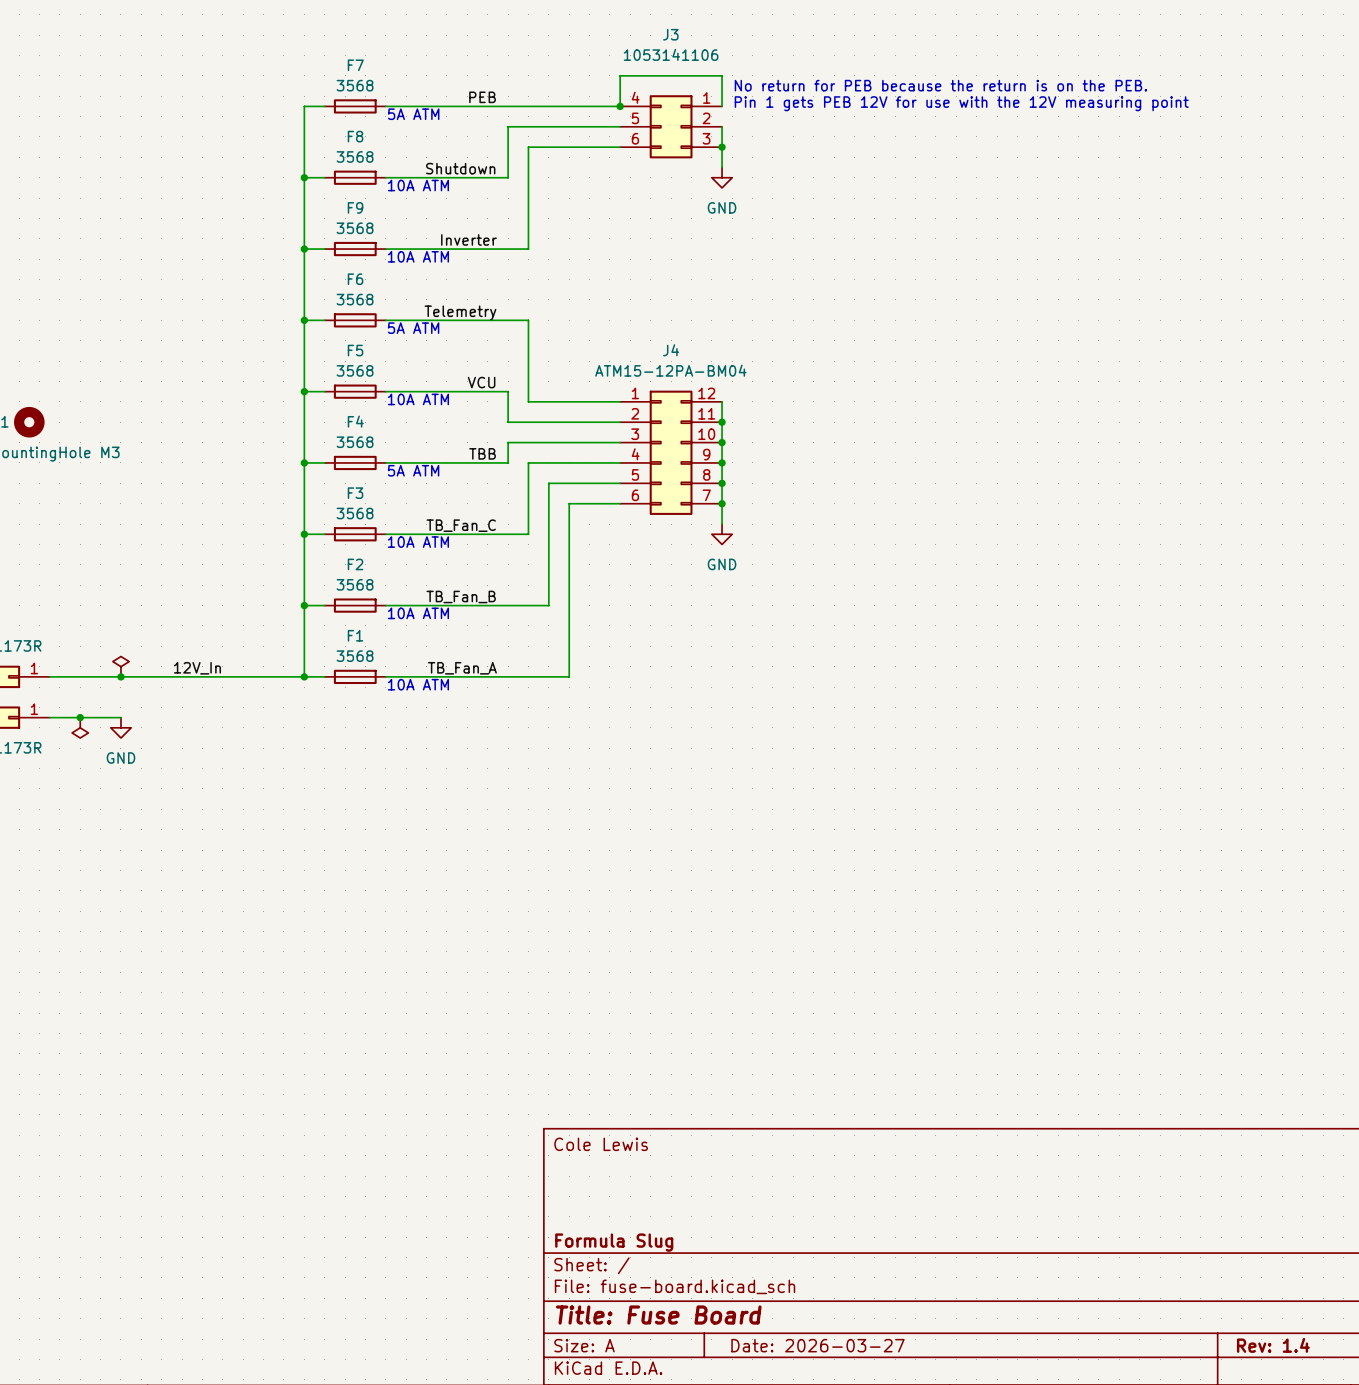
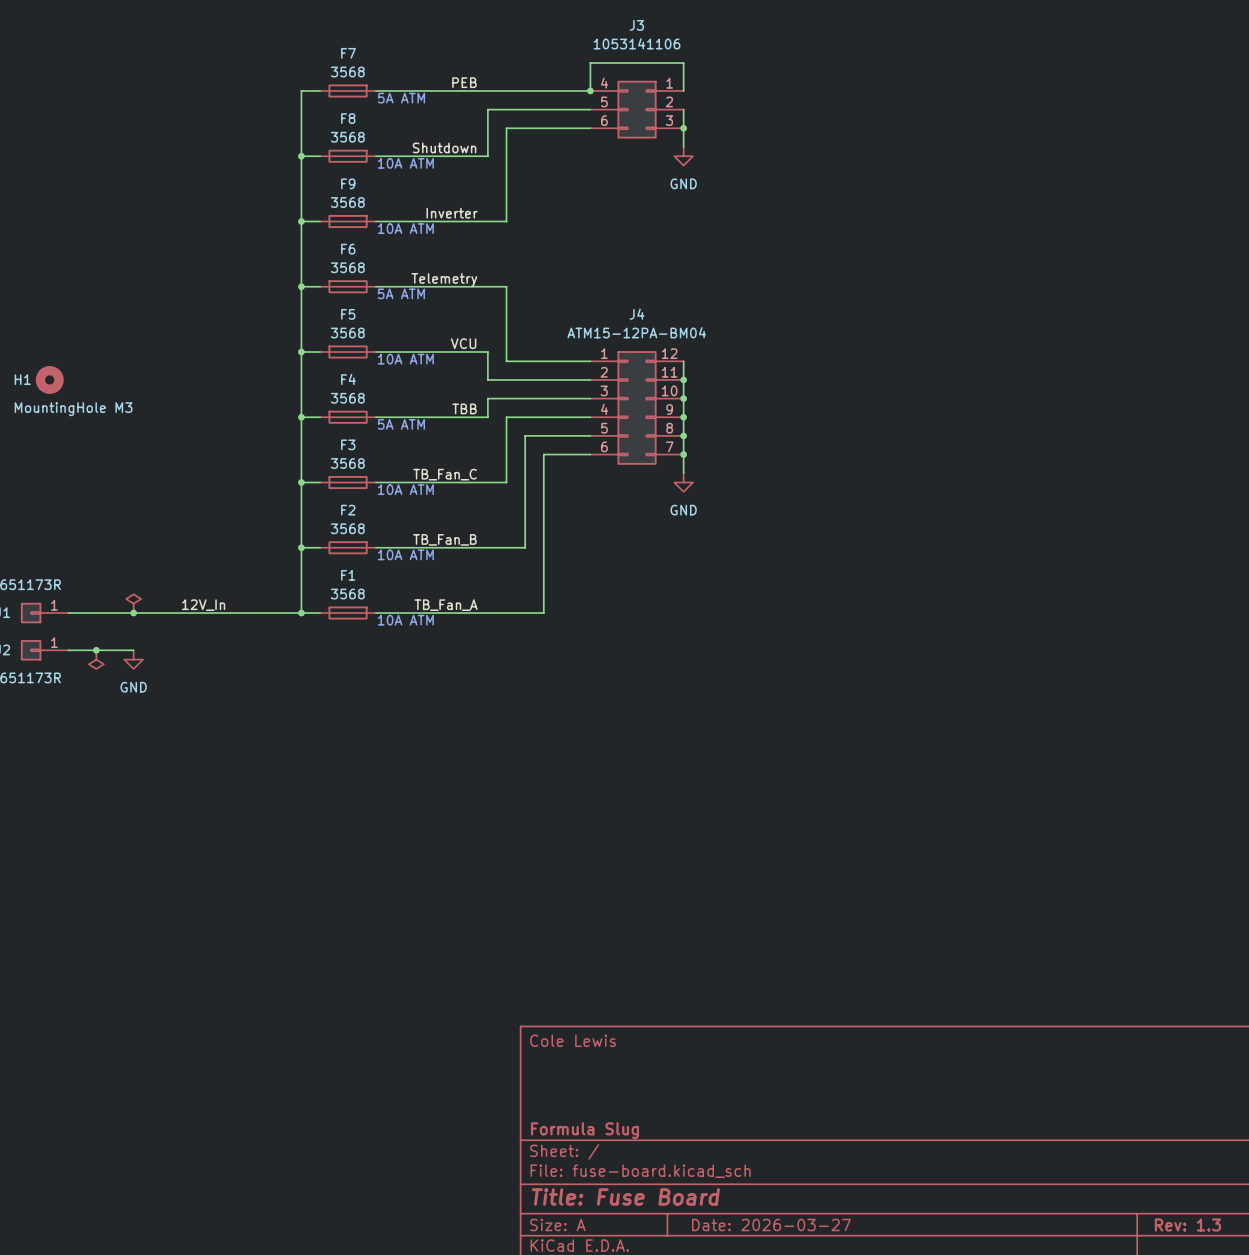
text: No return for PEB because the return is on the PEB. (940, 85) -> none
text: Pin 1 gets PEB 12V for use with the 12V measuring point (961, 103) -> none
title block: Rev: 1.4 (1273, 1345) -> Rev: 1.3 (1187, 1224)

